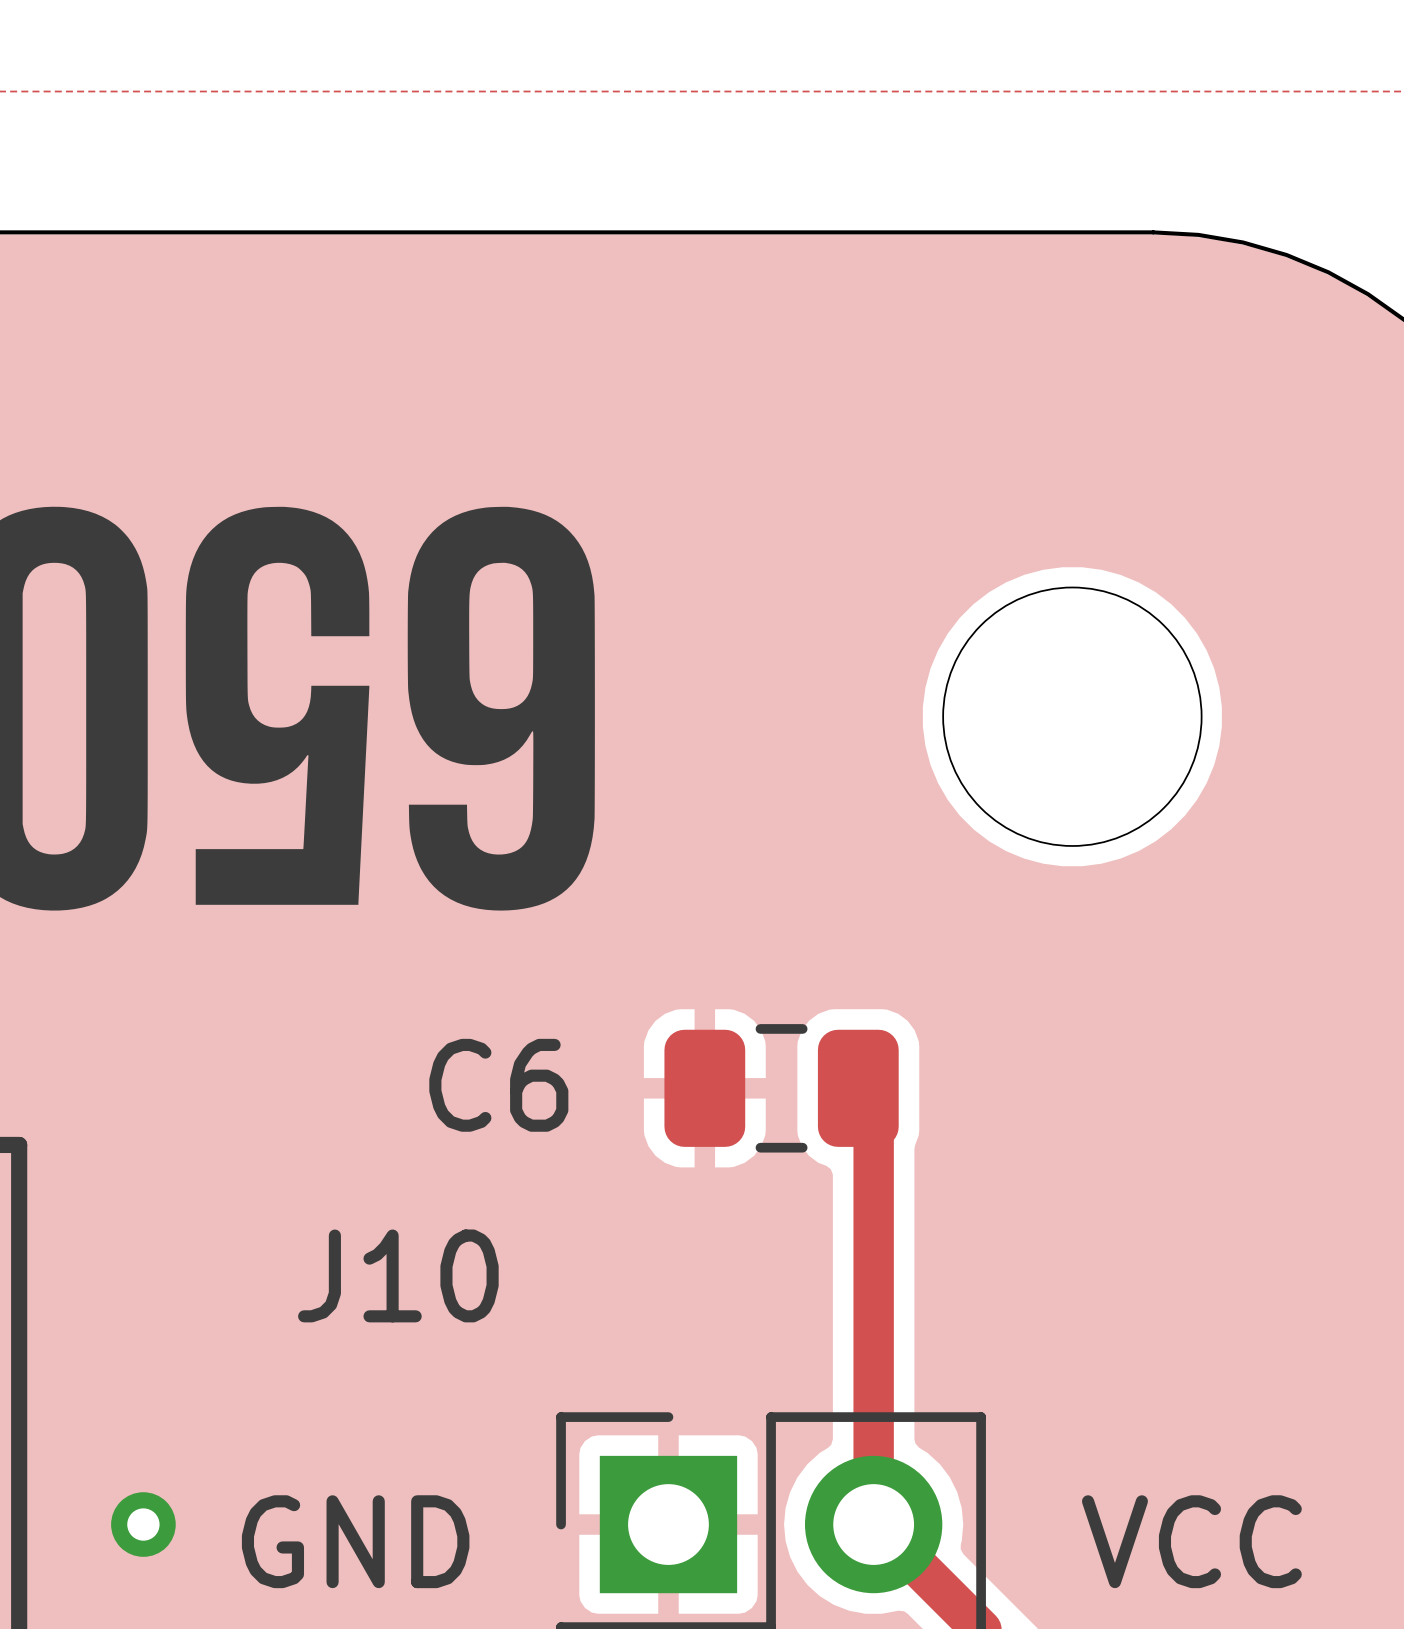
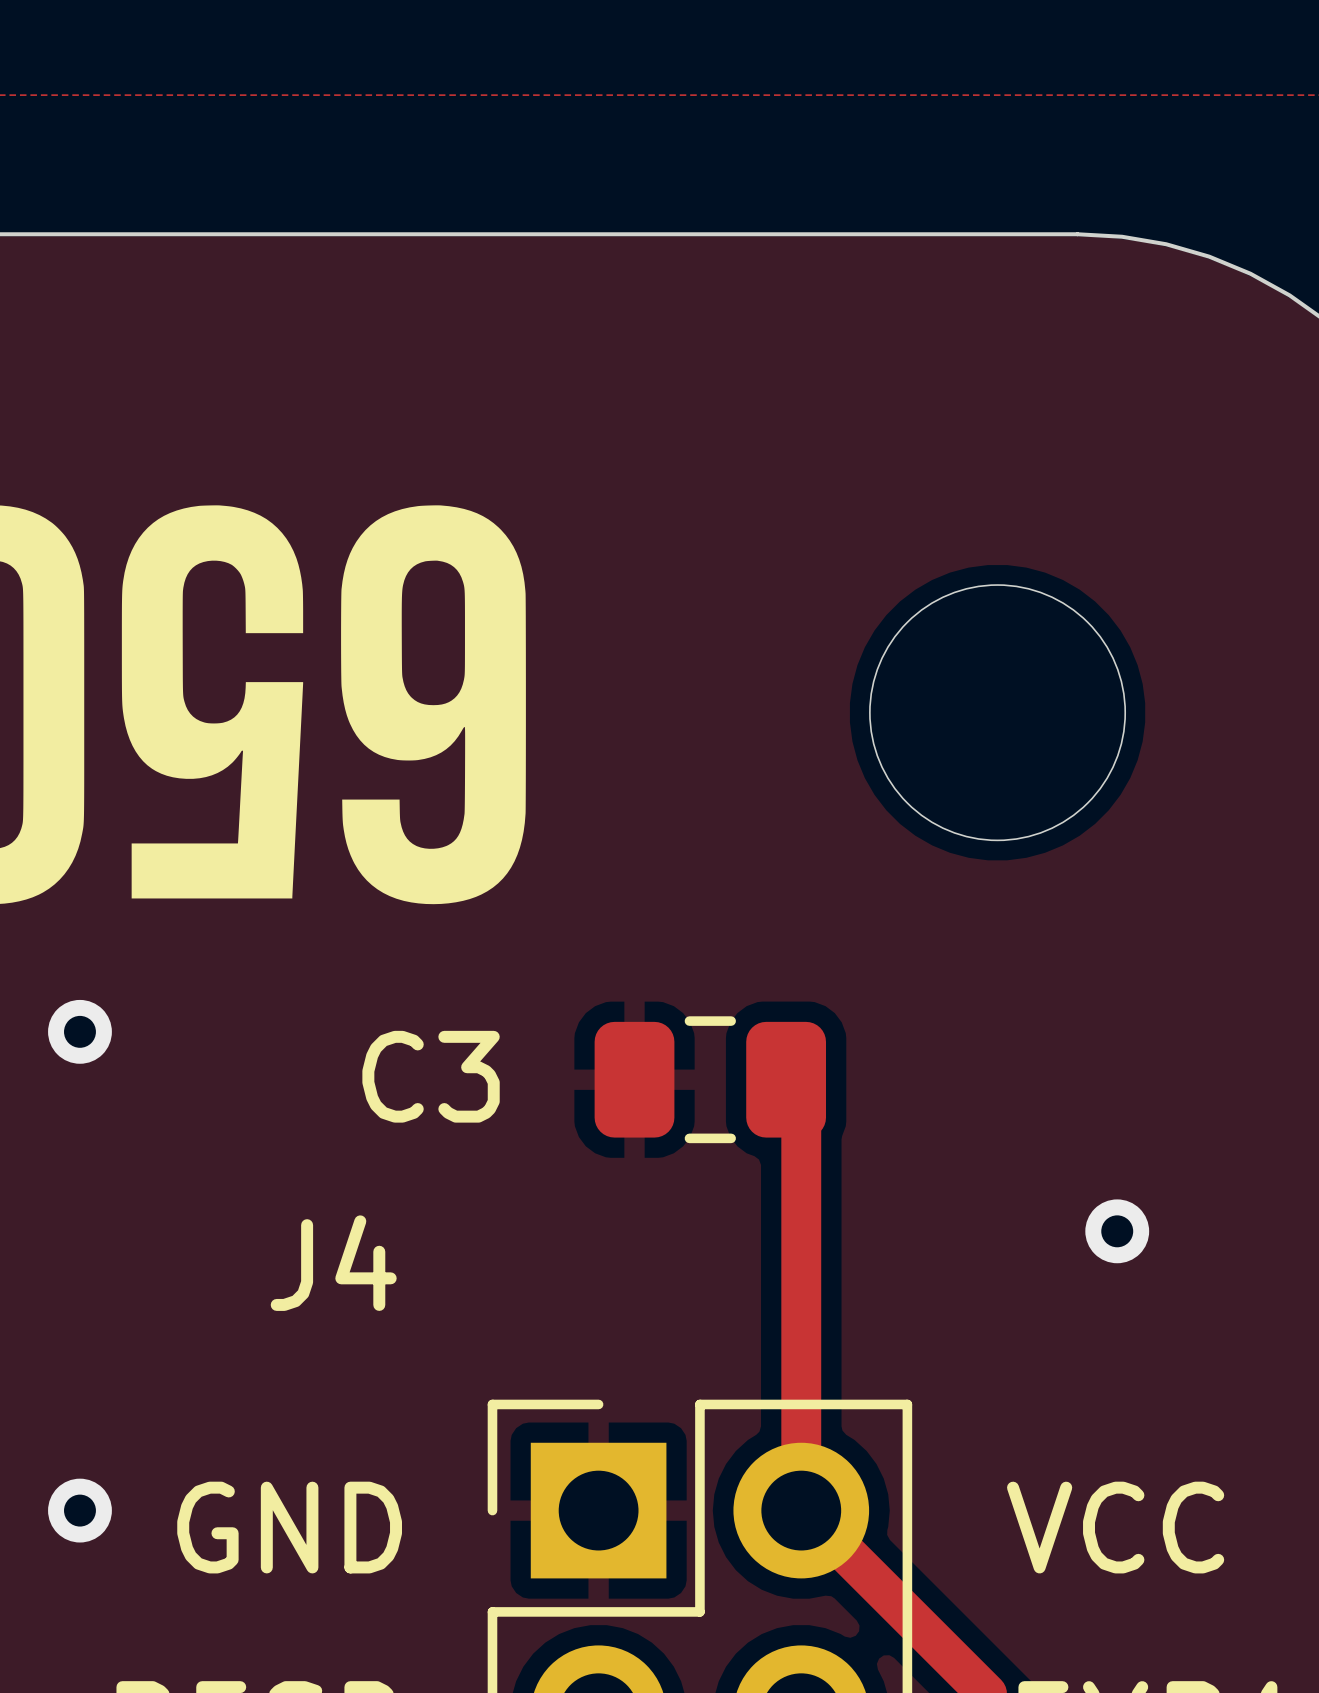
via: none -> (79, 1031)
C6 name: C6 (498, 1085) -> C3 (431, 1076)
via: none -> (1117, 1231)
J10 name: J10 (398, 1275) -> J4 (333, 1263)

